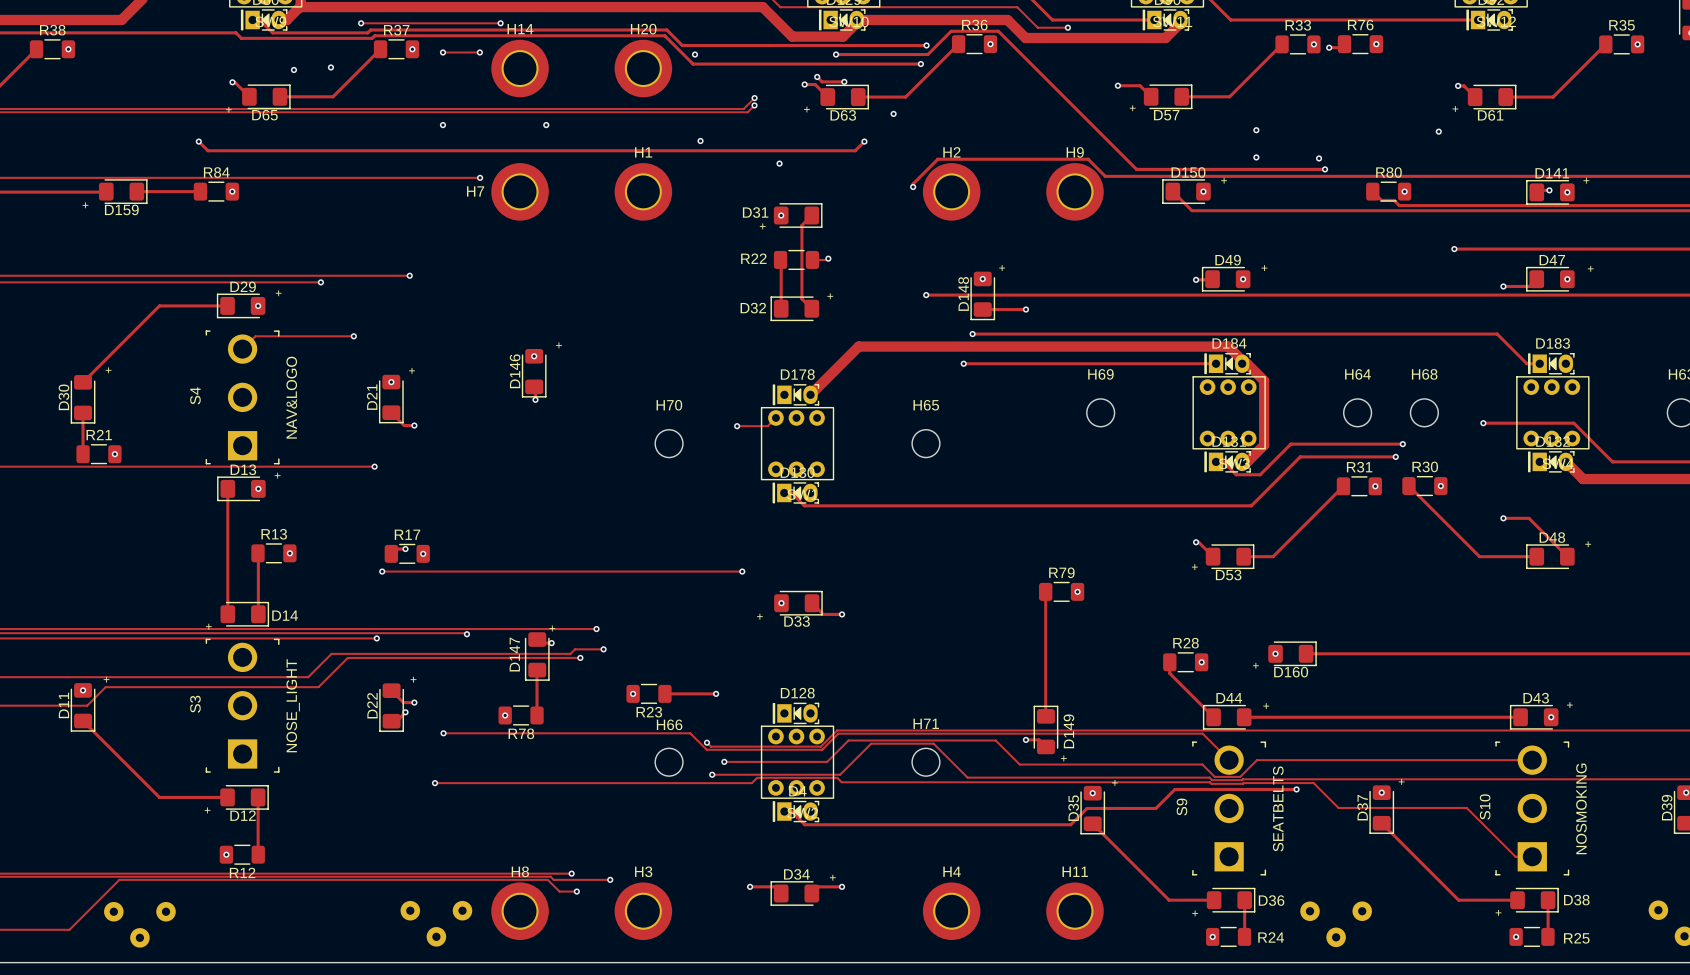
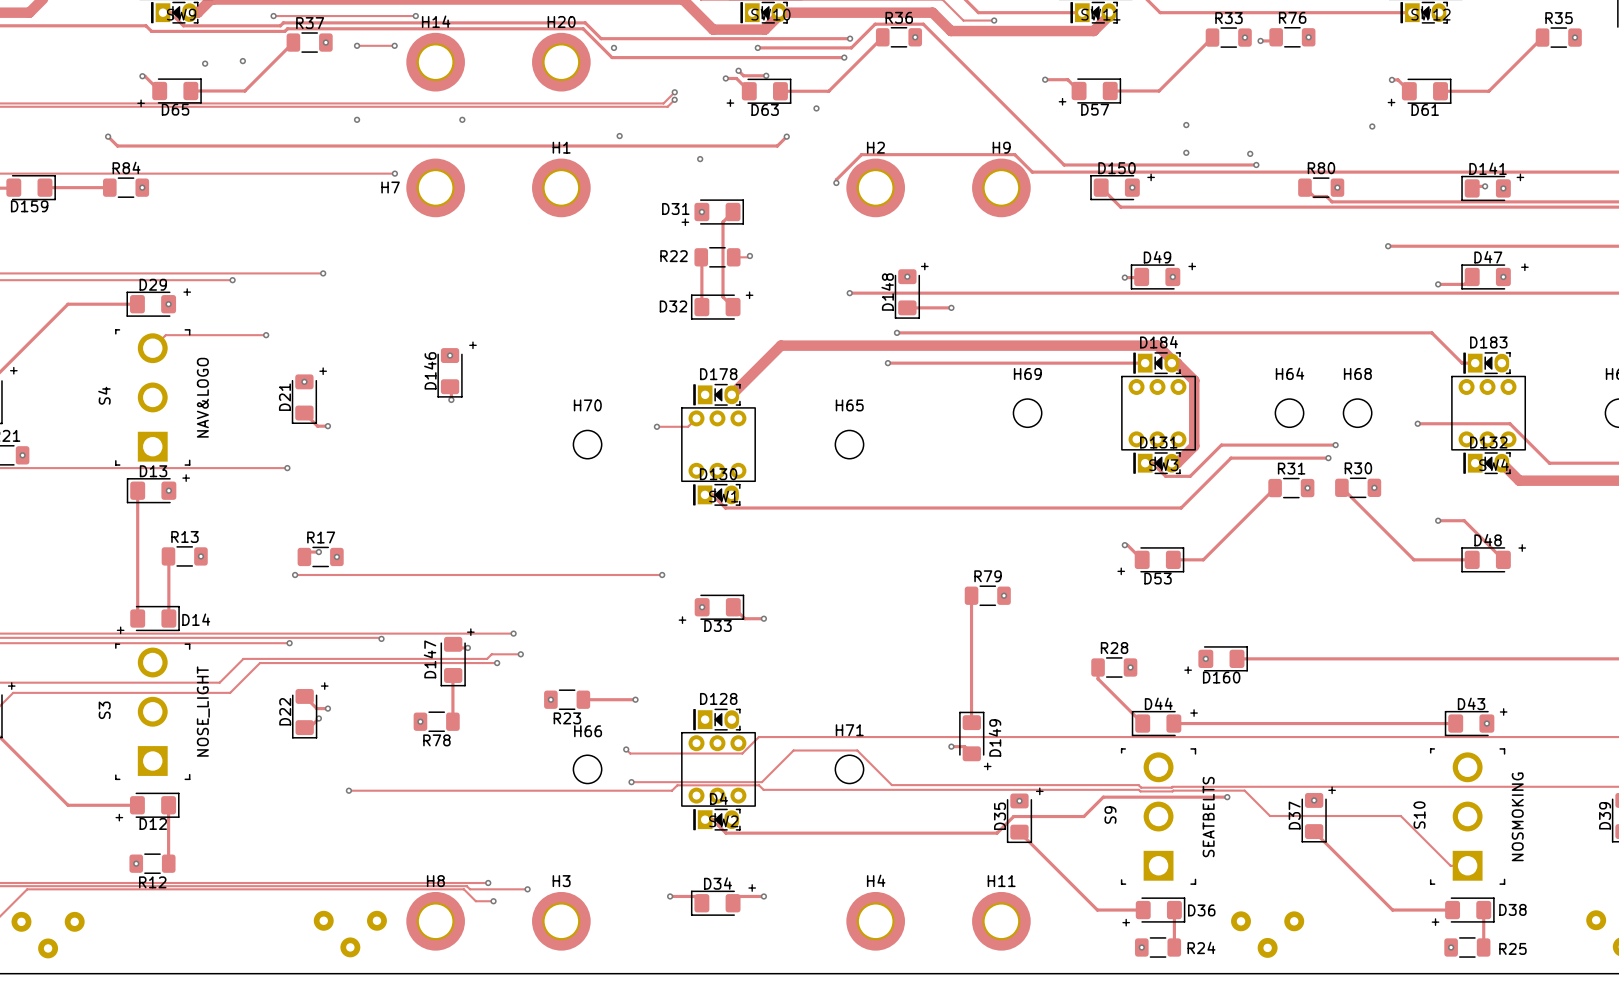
track: (443, 733) (690, 733) (706, 749) (822, 749) (838, 733) (1202, 733) (1229, 760) -> none
via: (443, 733) -> none
track: (1532, 760) (1256, 760) (1240, 776) (1214, 776) (1202, 764) (1019, 764) (995, 740) (848, 740) (827, 761) (724, 761) -> none
via: (724, 761) -> none

